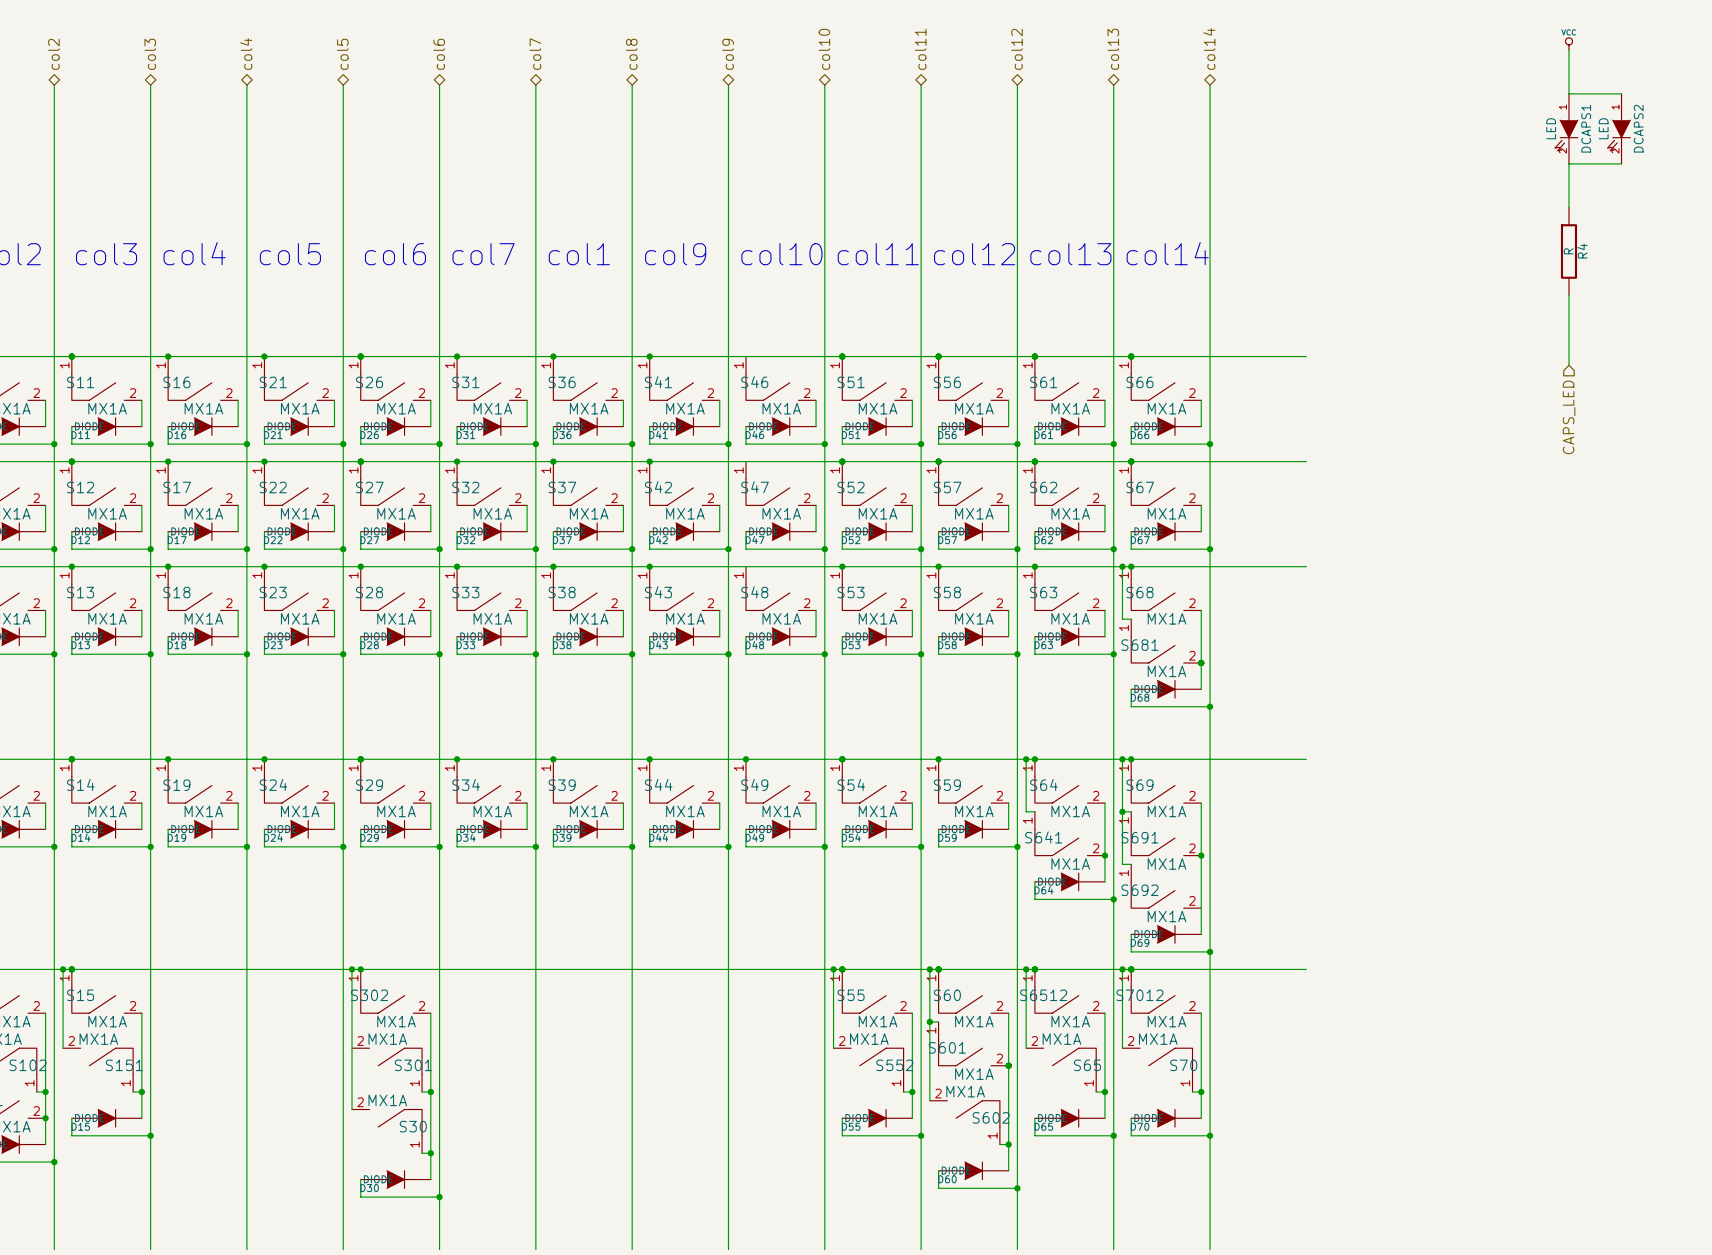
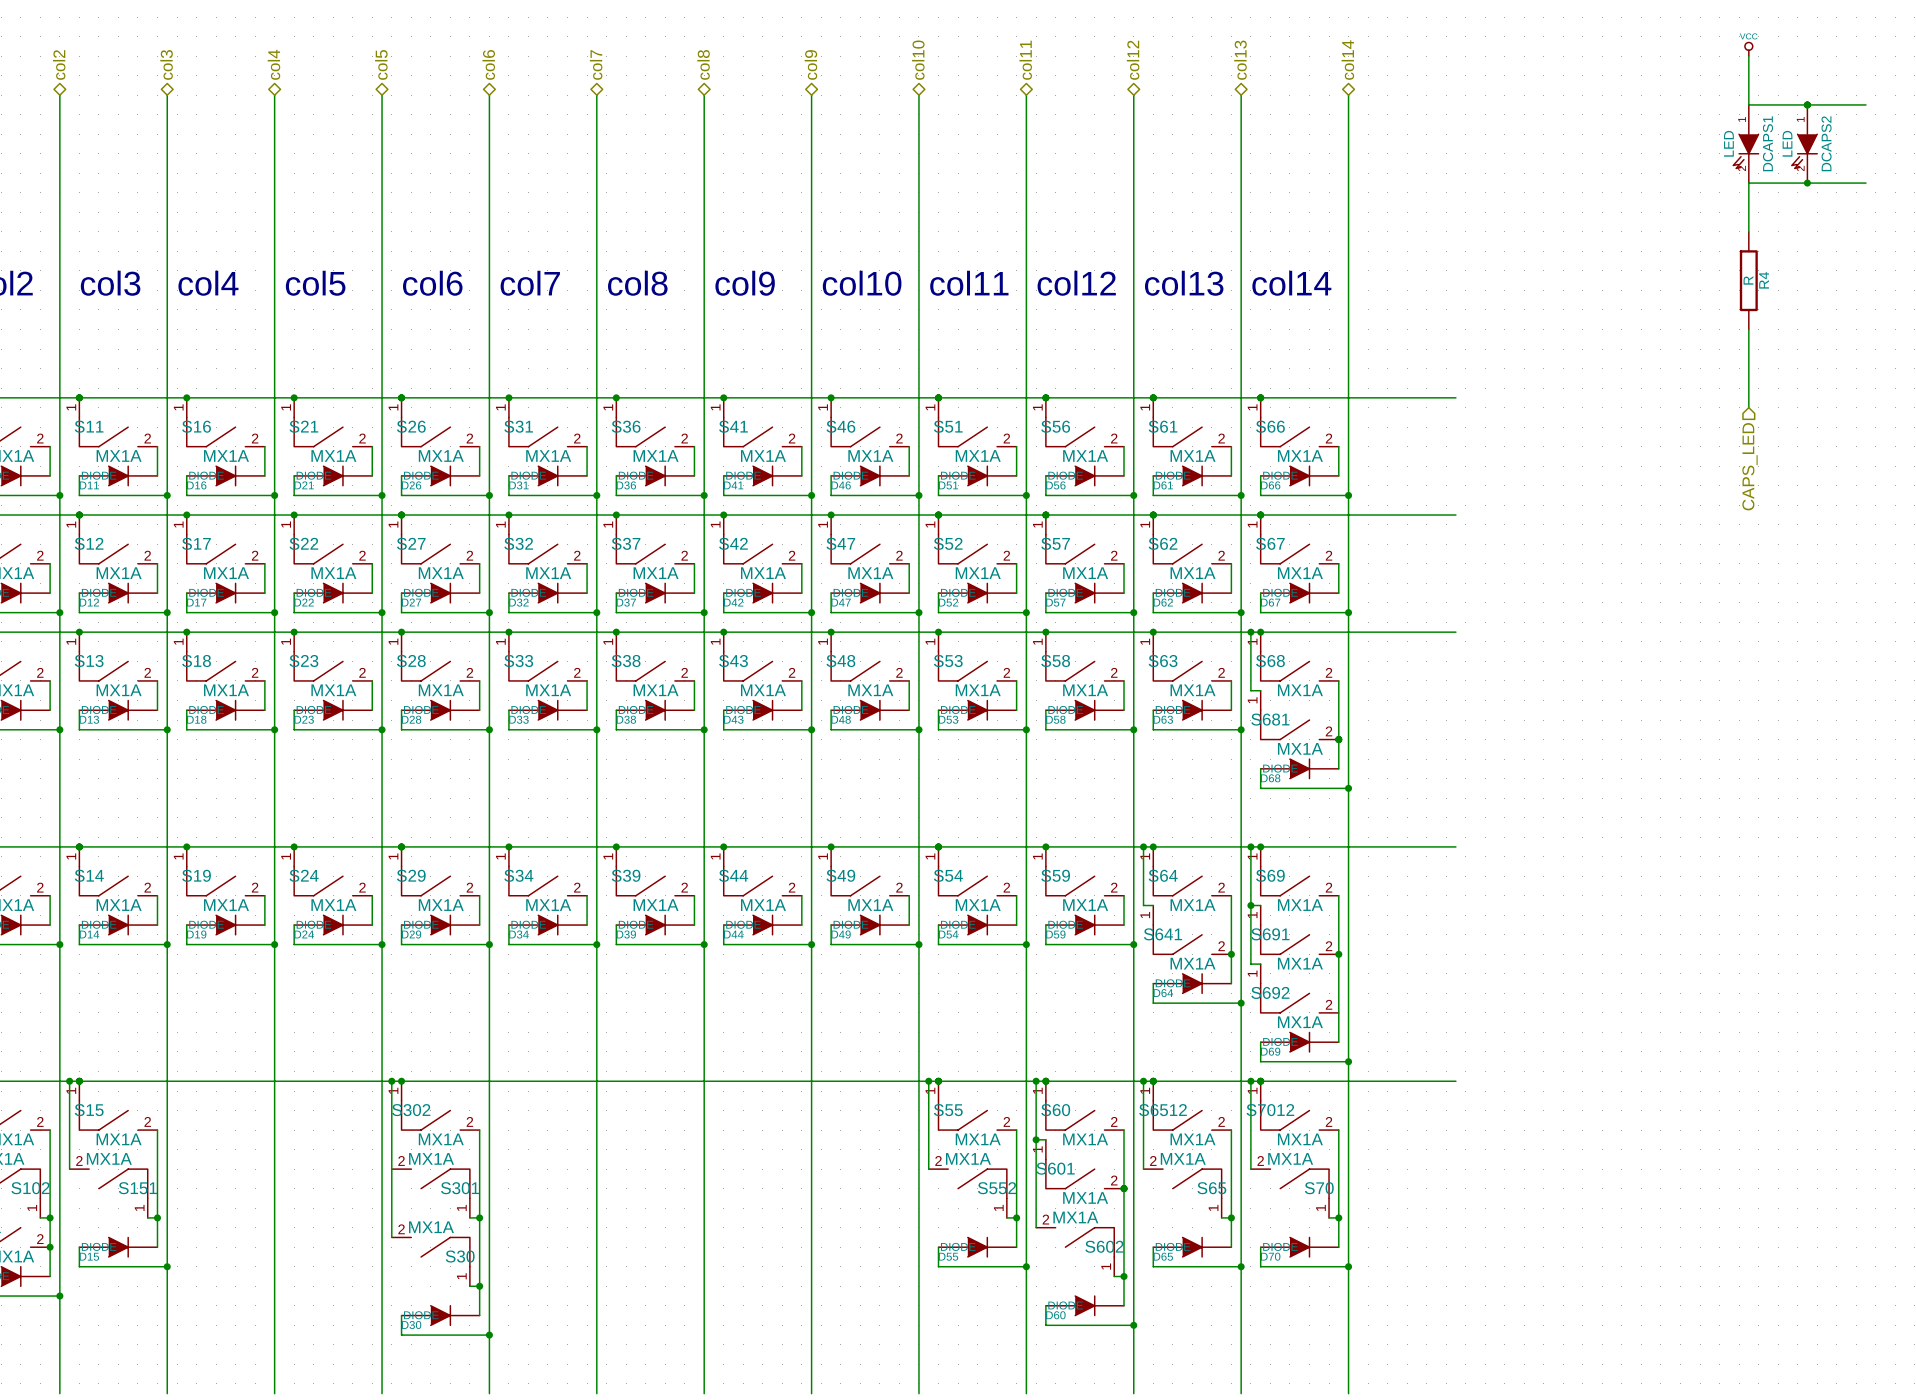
wire: none -> (1807, 104) (1865, 104)
junction: none -> (1807, 104)
wire: none -> (1807, 183) (1865, 183)
junction: none -> (1807, 183)
text: col1 (579, 254) -> col8 (637, 283)
junction: none -> (831, 397)
junction: none -> (831, 515)
junction: none -> (831, 632)

